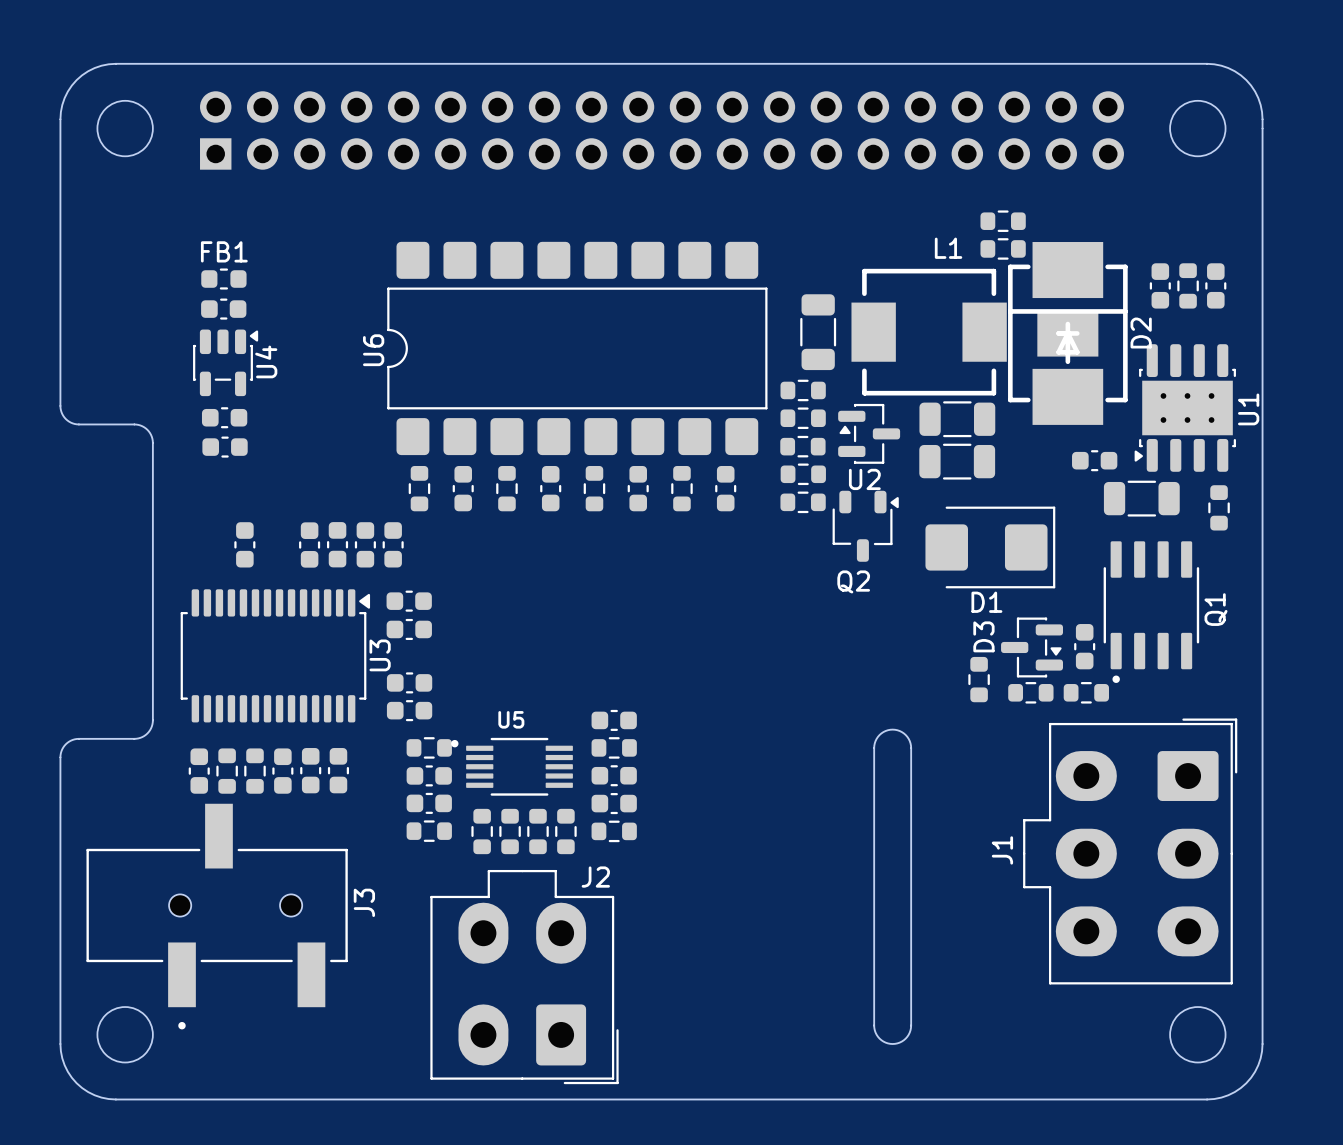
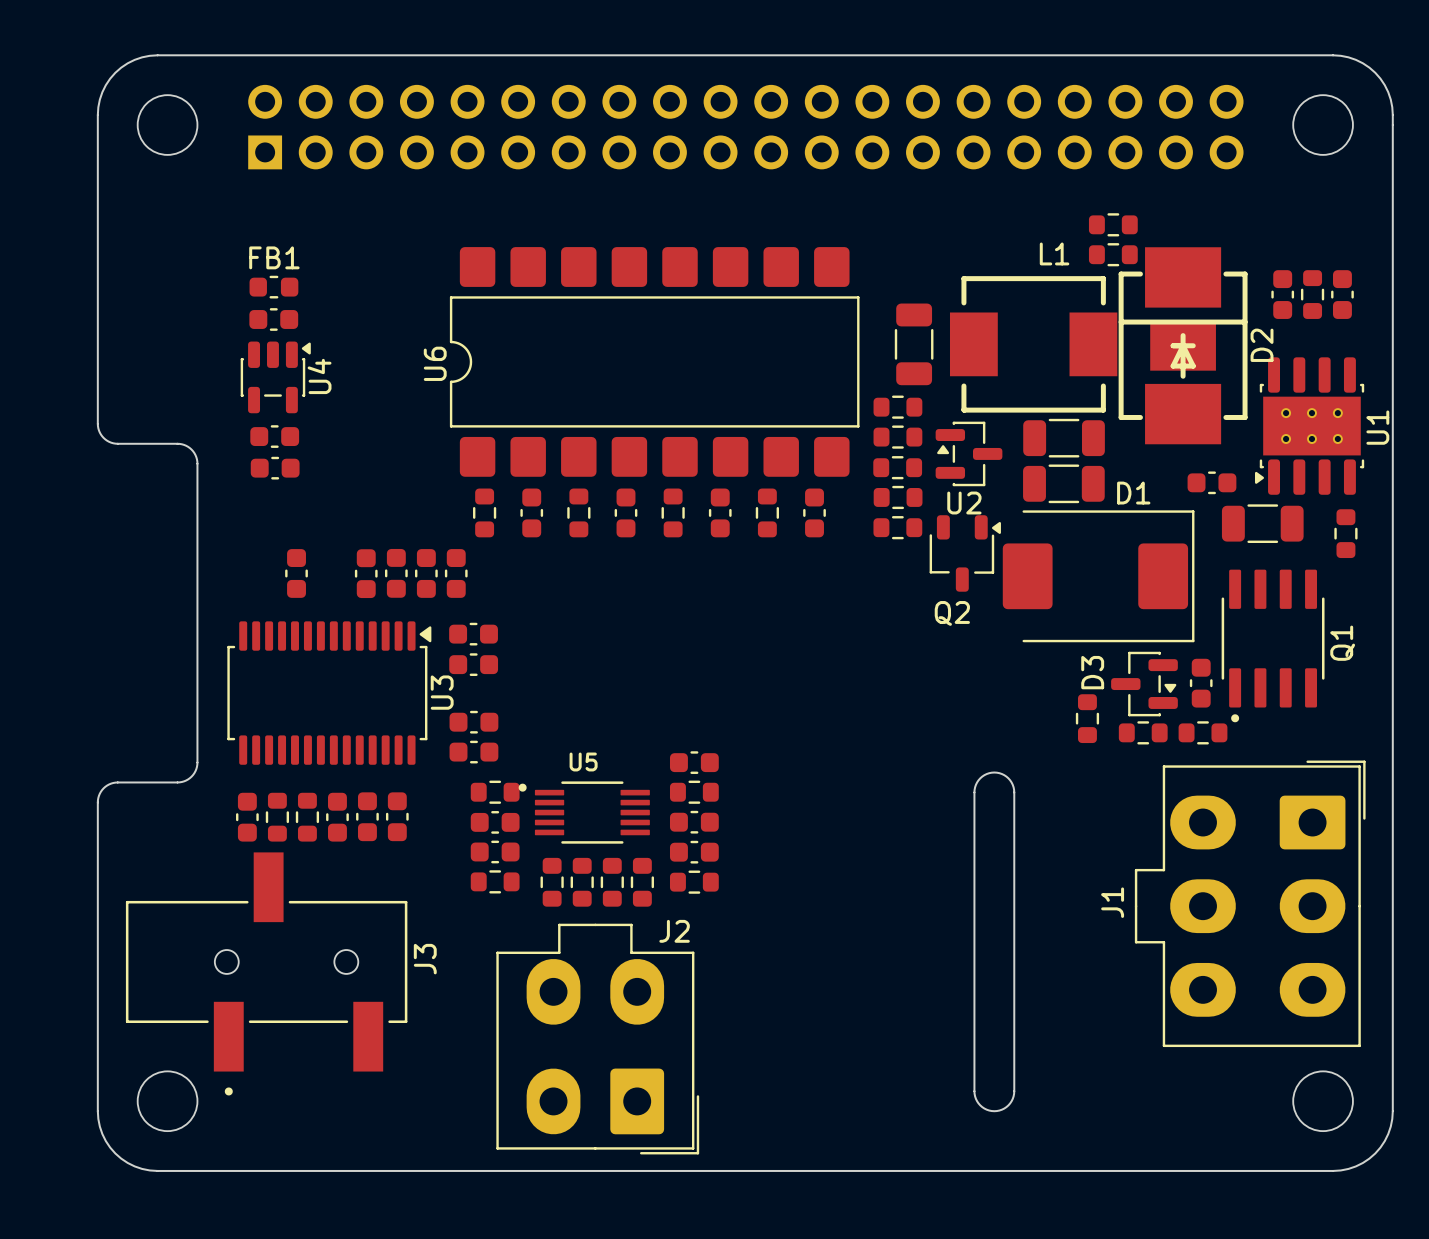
D1 footprint: [925, 506, 1056, 589] -> [1002, 510, 1195, 643]
D1 name position: D1 (986, 602) -> D1 (1133, 493)

